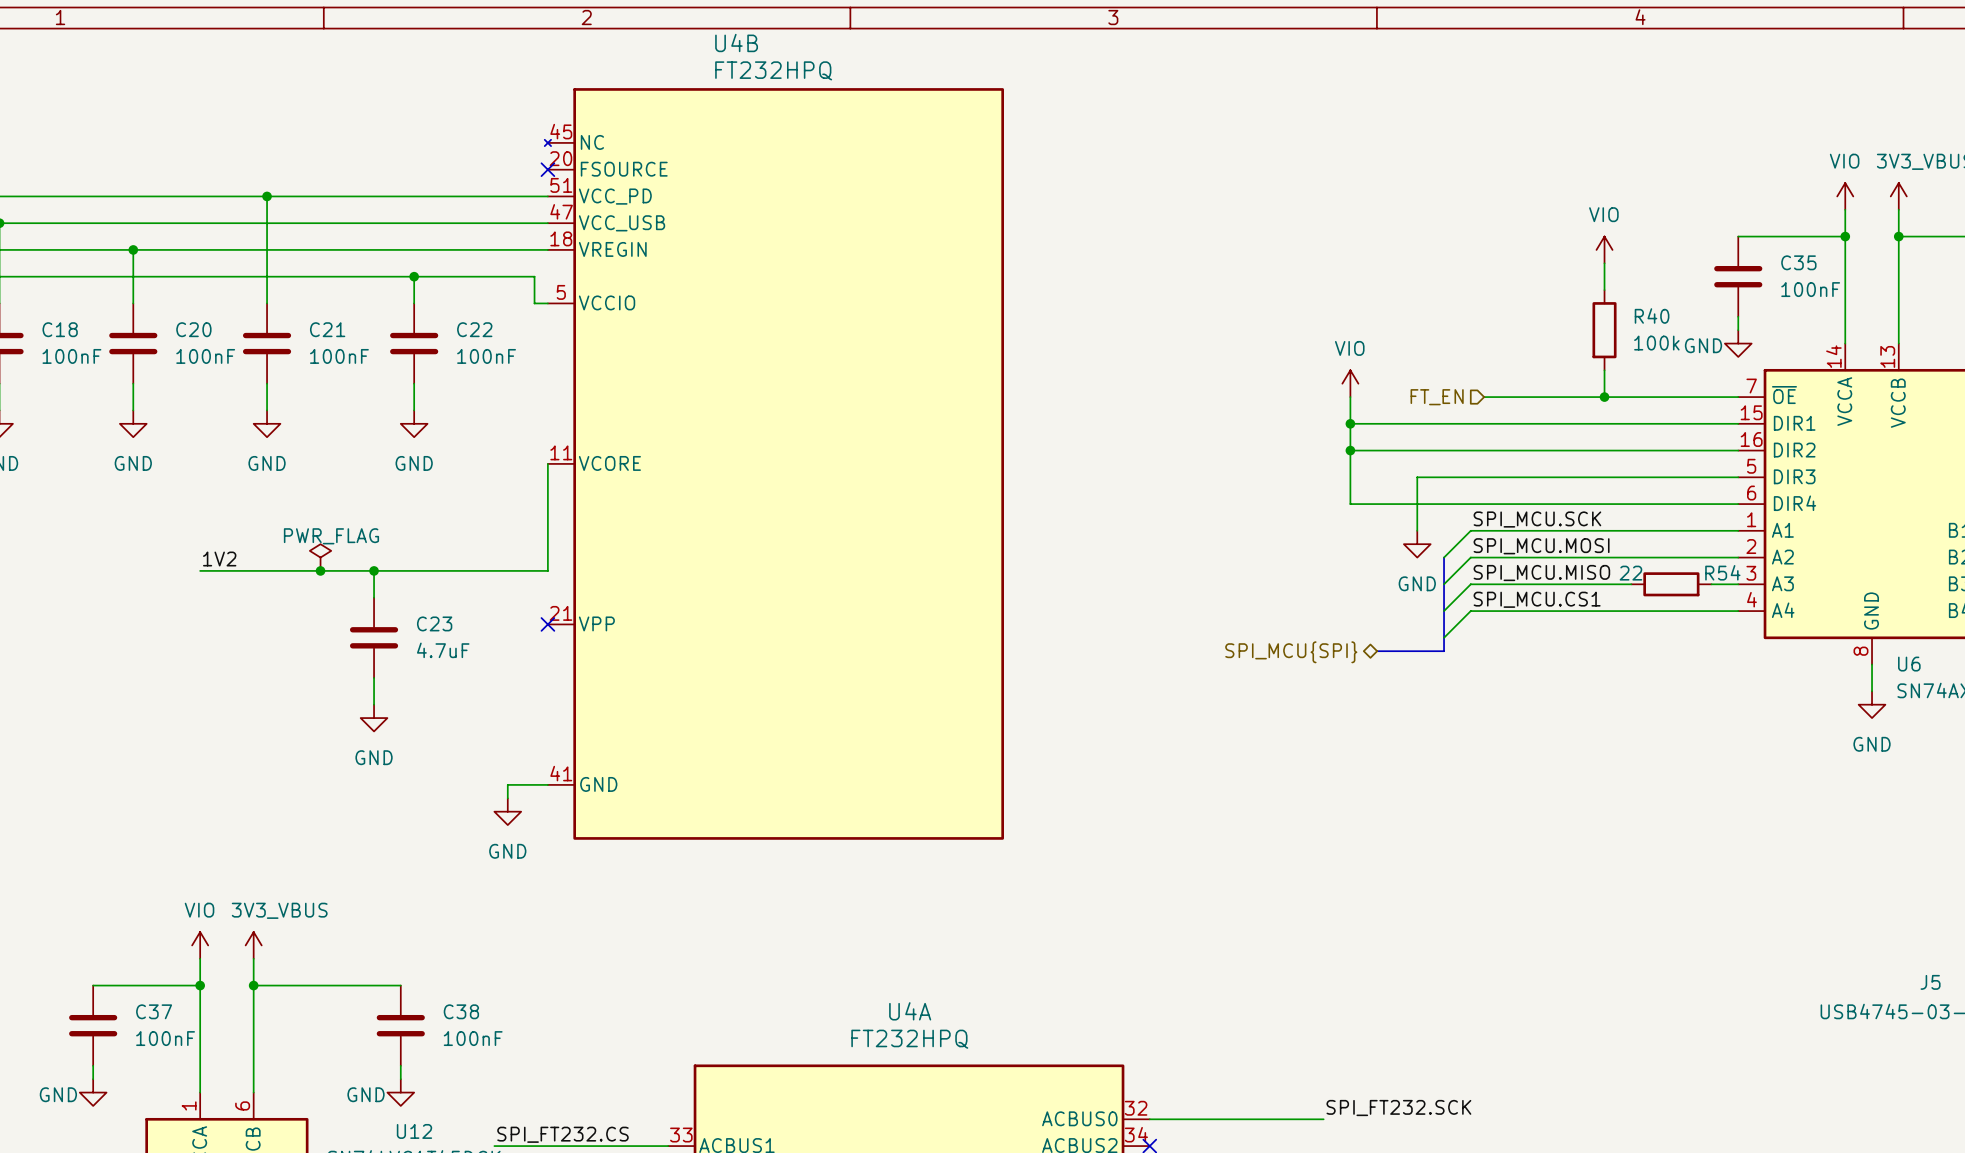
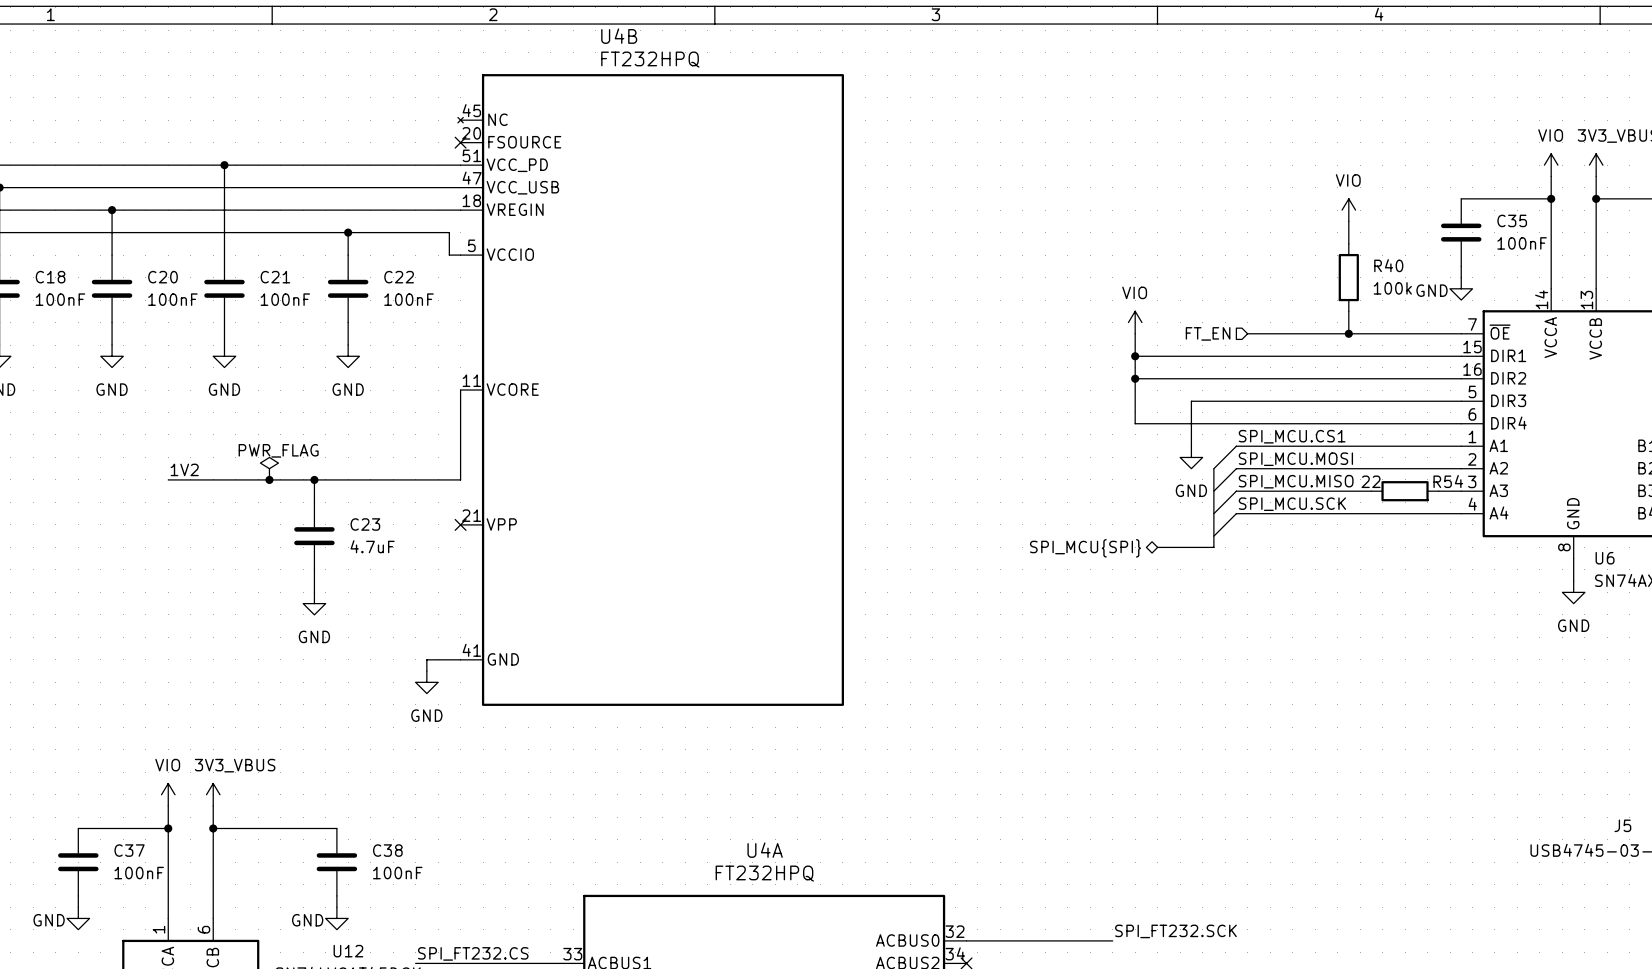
label: SPI_MCU.SCK (1537, 519) -> SPI_MCU.CS1 (1292, 436)
label: SPI_MCU.CS1 (1537, 599) -> SPI_MCU.SCK (1292, 504)

